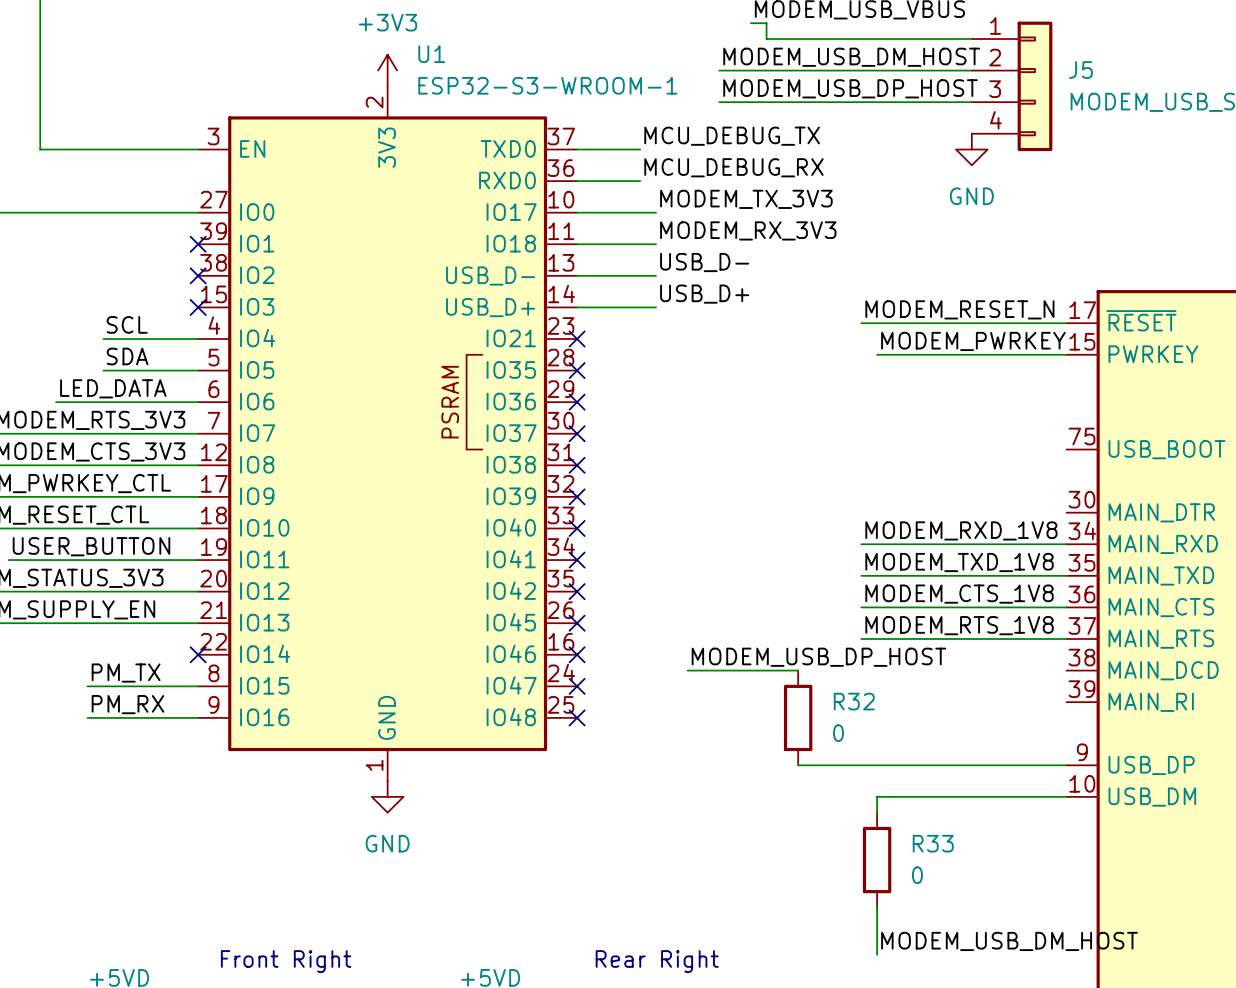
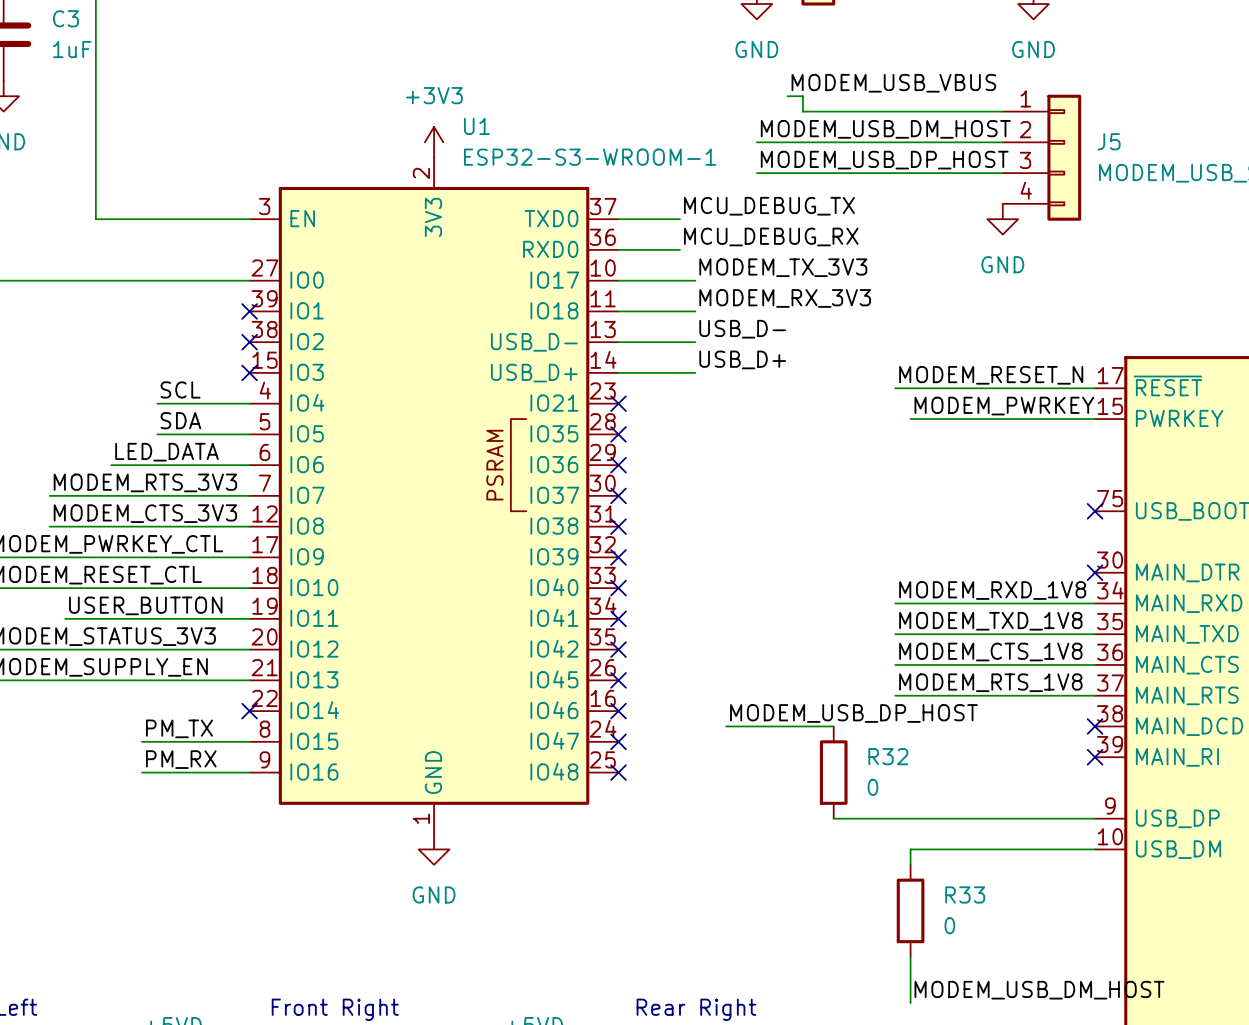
no-connect mark: none -> (1095, 511)
no-connect mark: none -> (1095, 572)
no-connect mark: none -> (1095, 726)
no-connect mark: none -> (1095, 757)

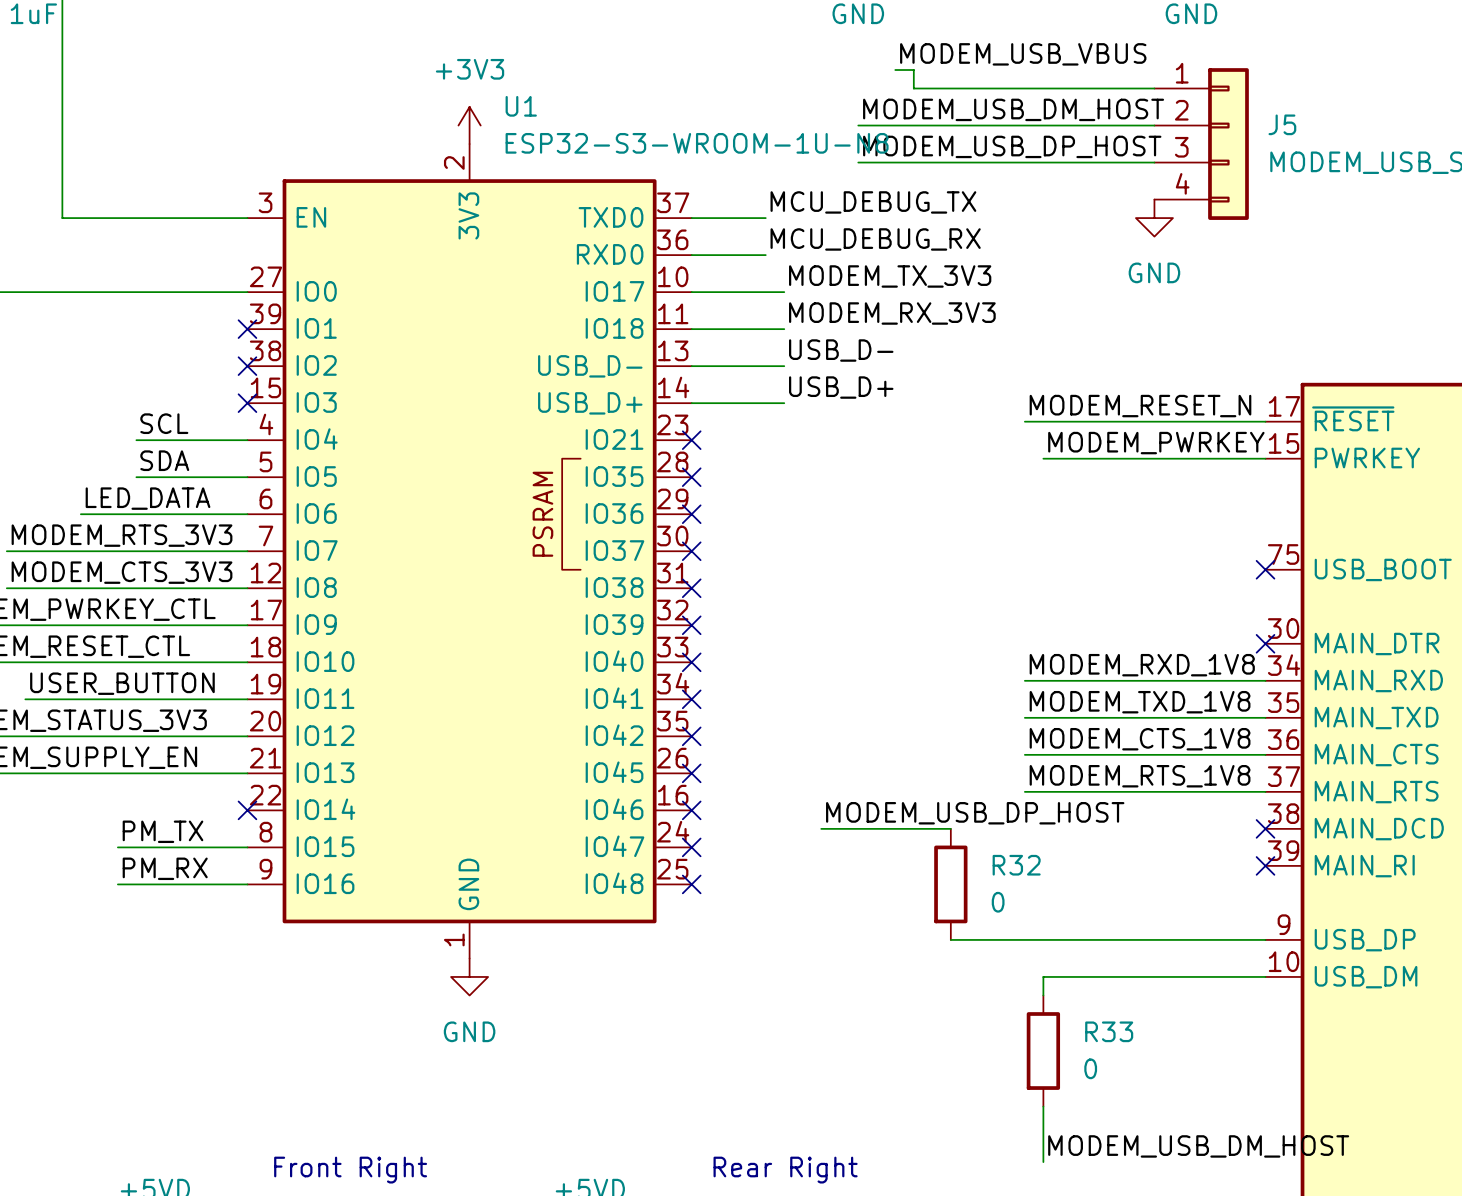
U1 value: ESP32-S3-WROOM-1 (590, 157) -> ESP32-S3-WROOM-1U-N8 (697, 143)

